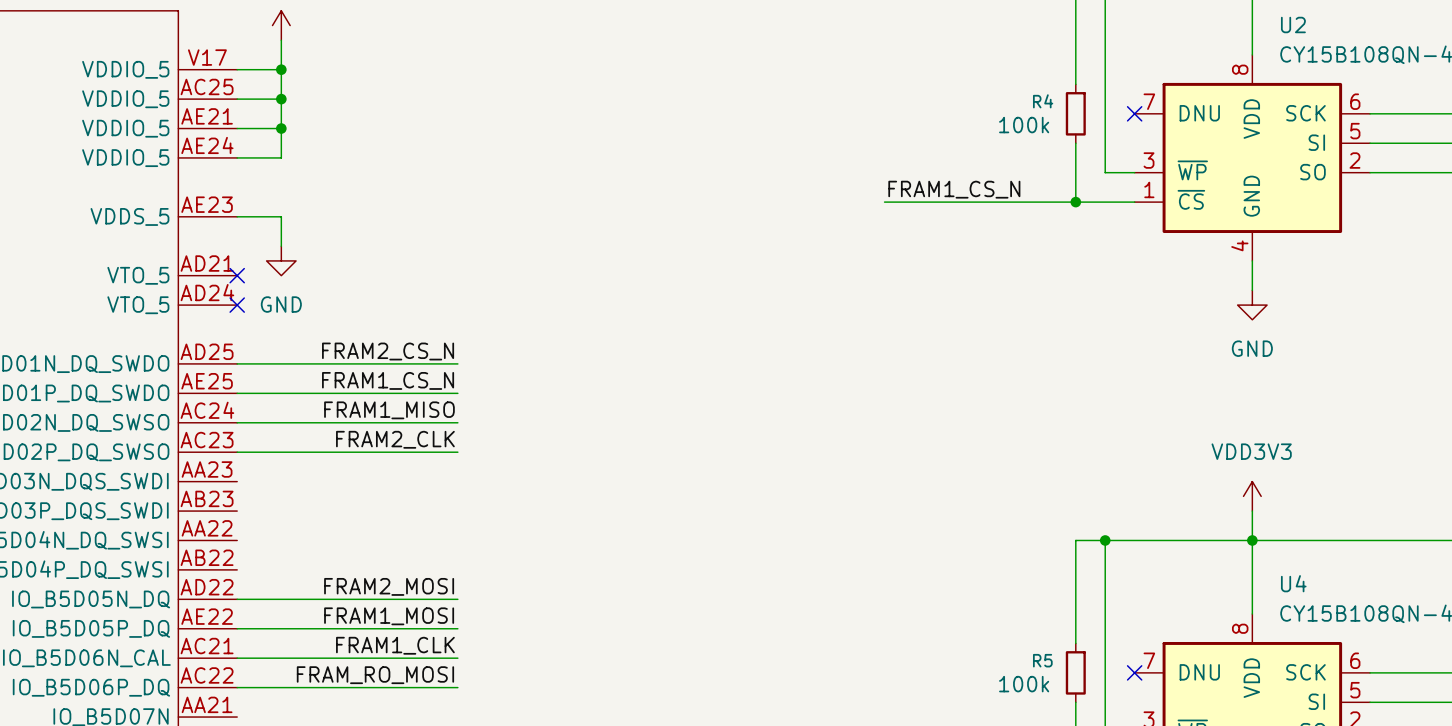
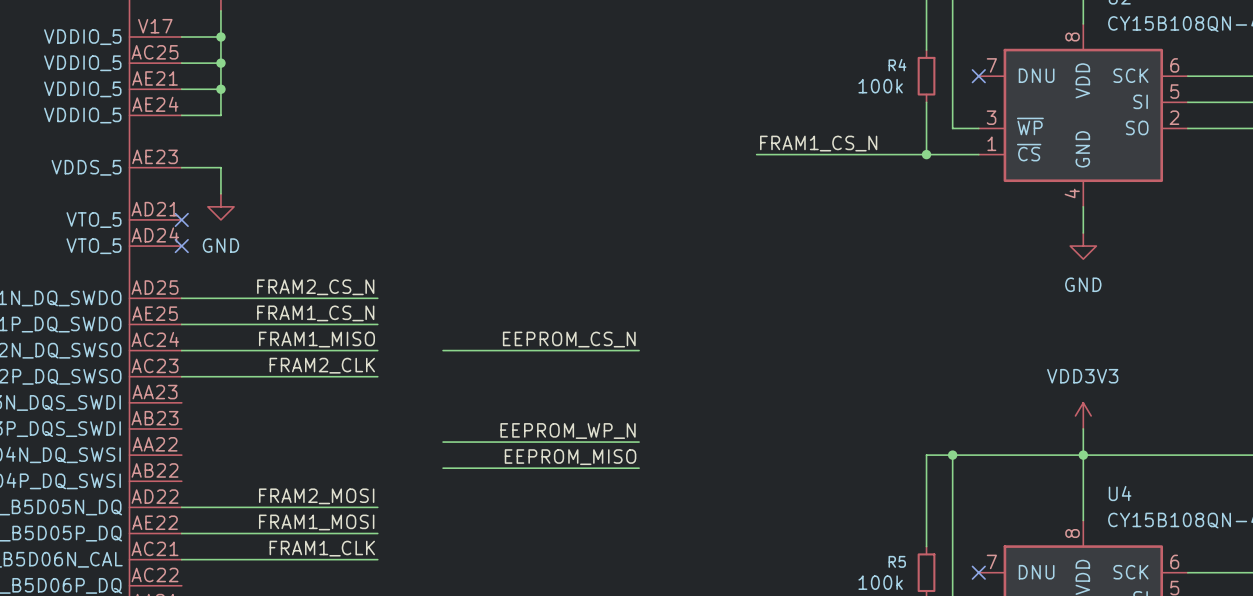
label: none -> EEPROM_CS_N (569, 339)
wire: none -> (443, 350) (639, 350)
label: none -> EEPROM_WP_N (568, 431)
wire: none -> (443, 442) (639, 442)
label: none -> EEPROM_MISO (570, 457)
wire: none -> (443, 468) (639, 468)
label: FRAM_RO_MOSI (375, 675) -> none
wire: (237, 687) (457, 687) -> none

